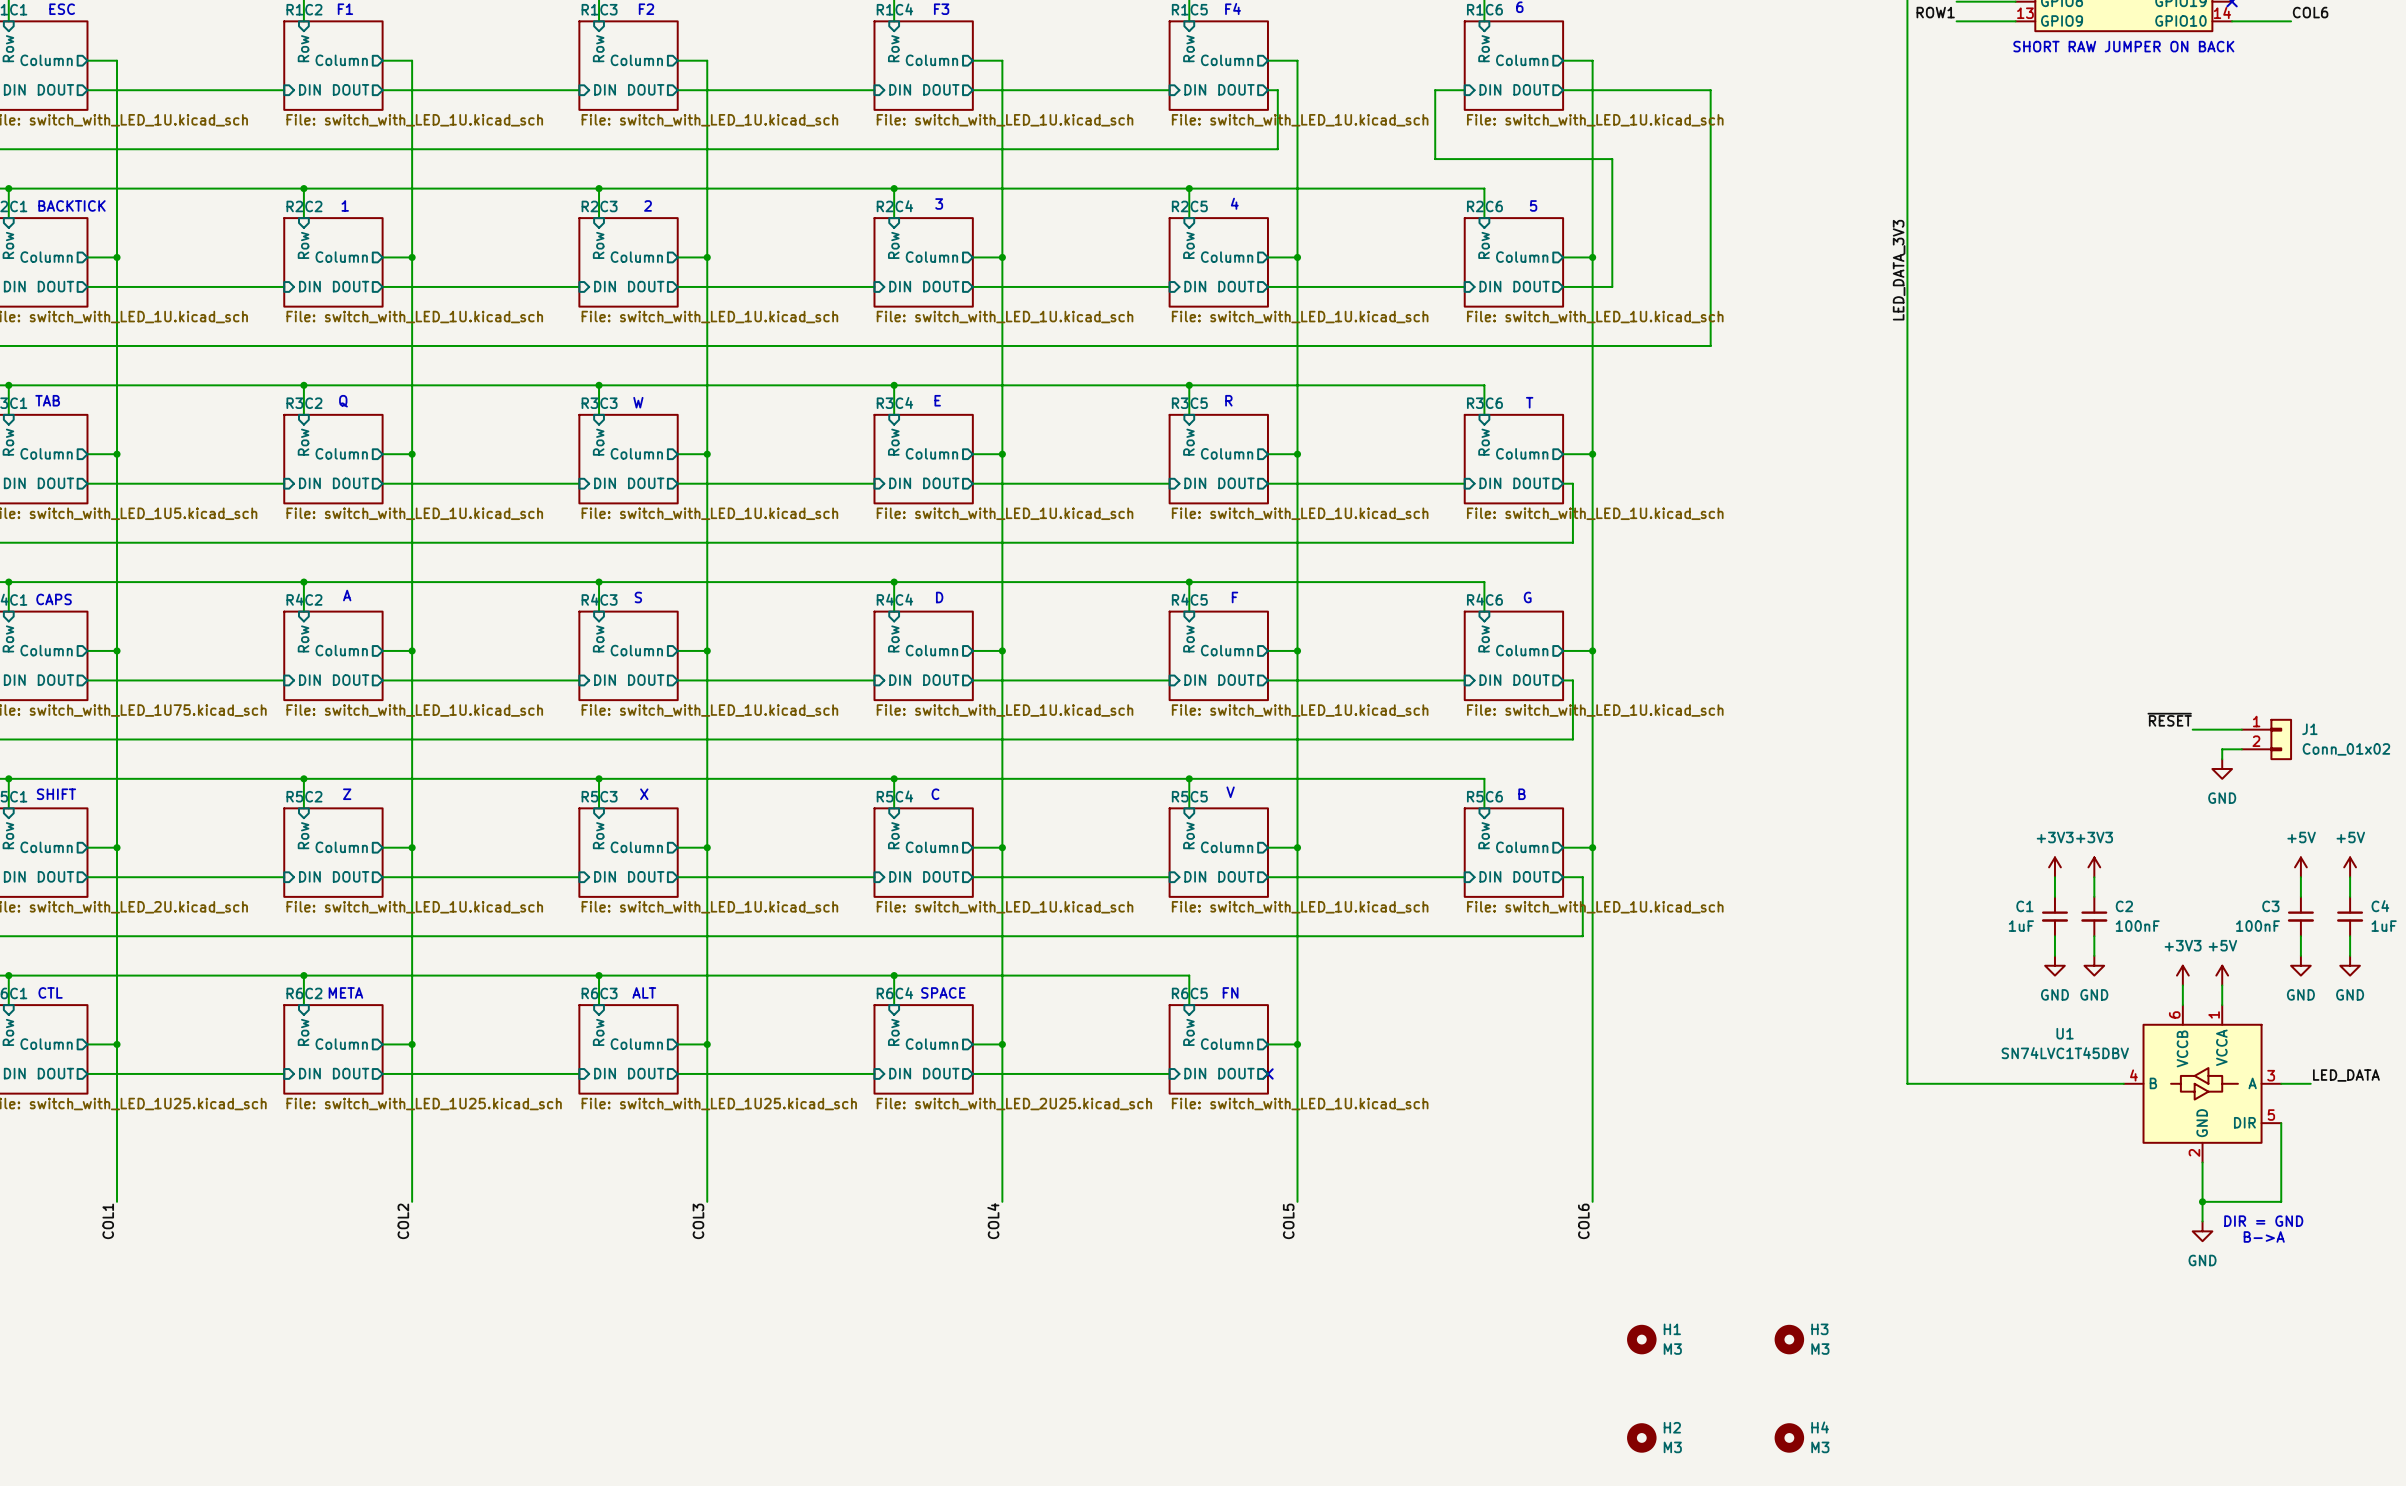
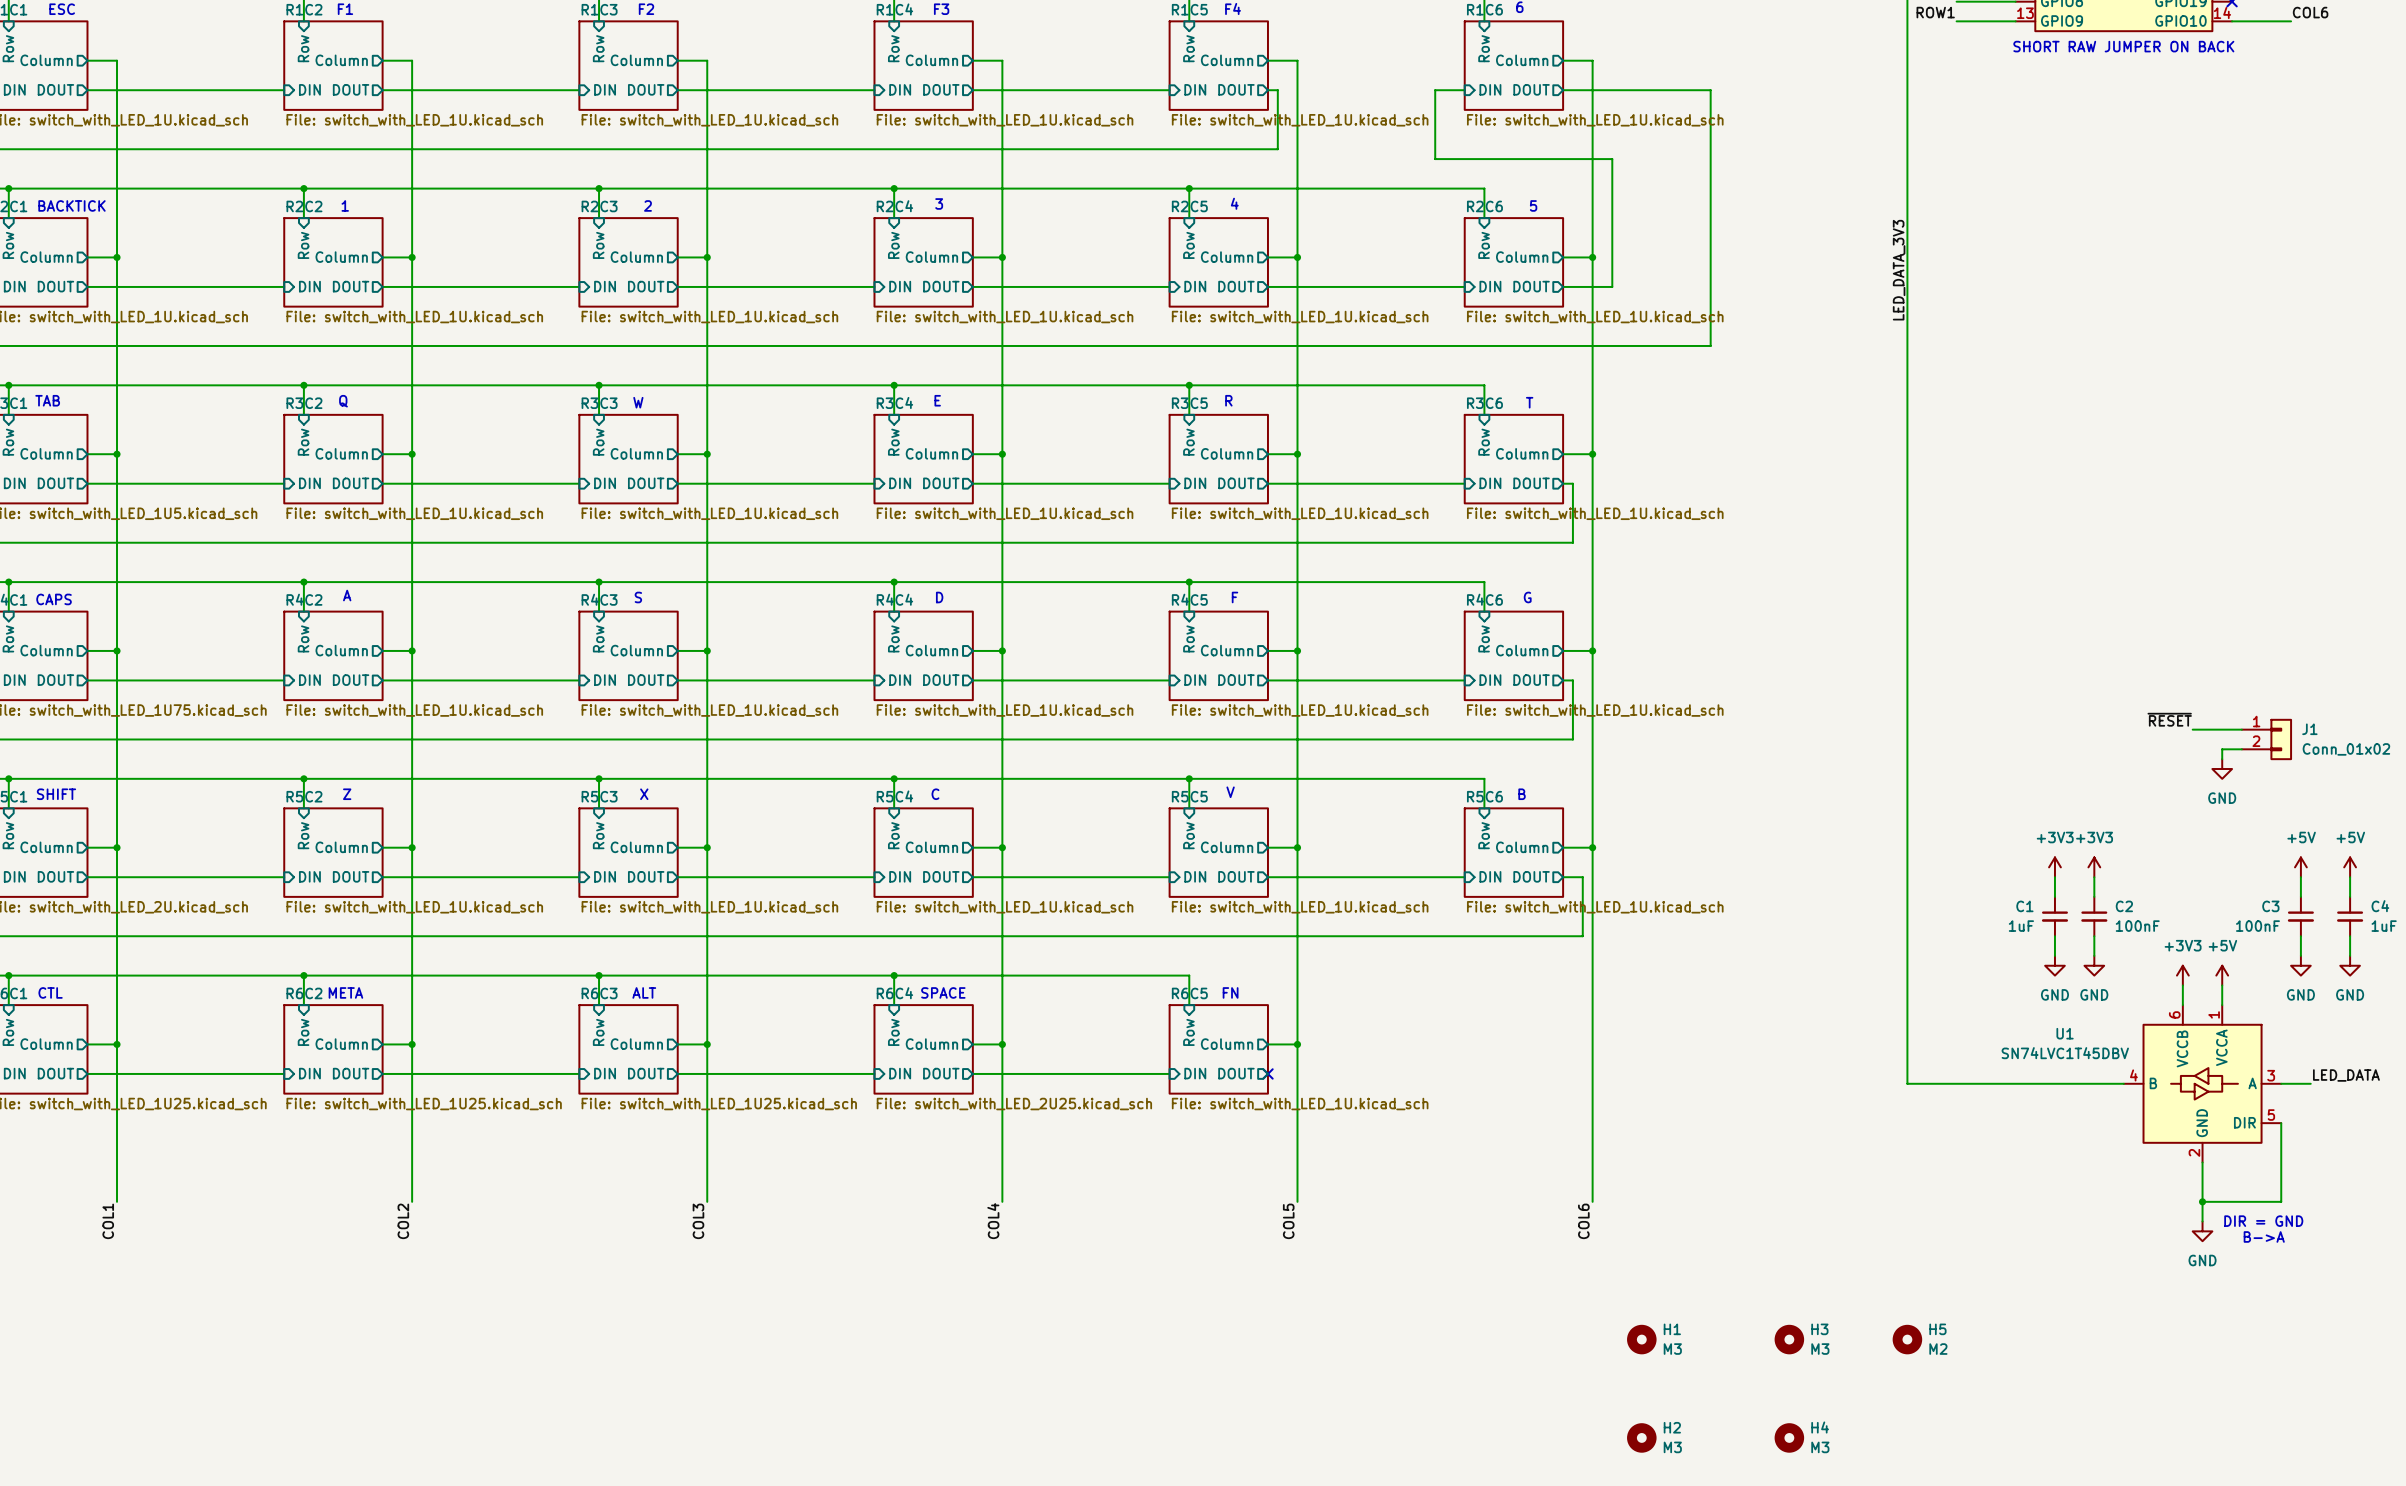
H5: none -> M2 (1907, 1339)

